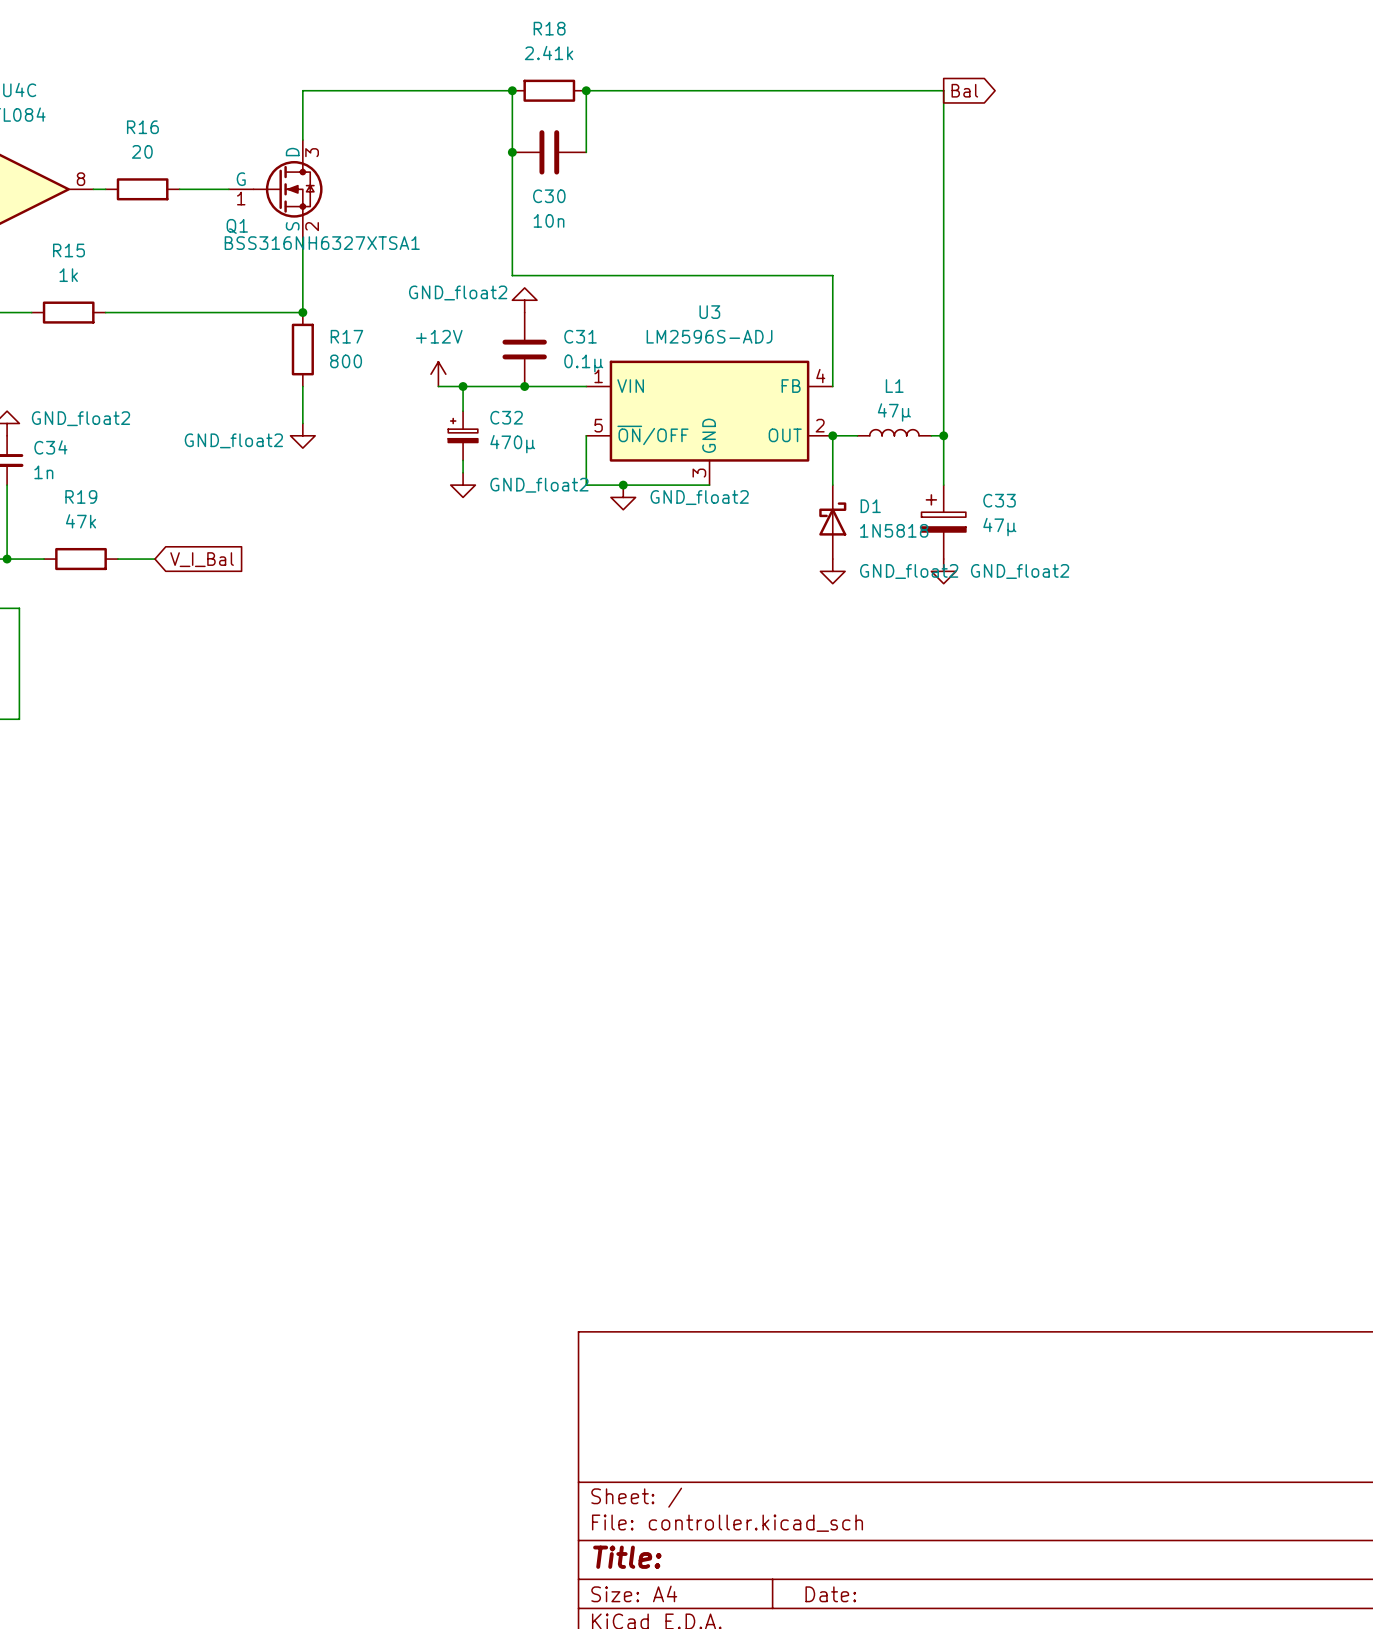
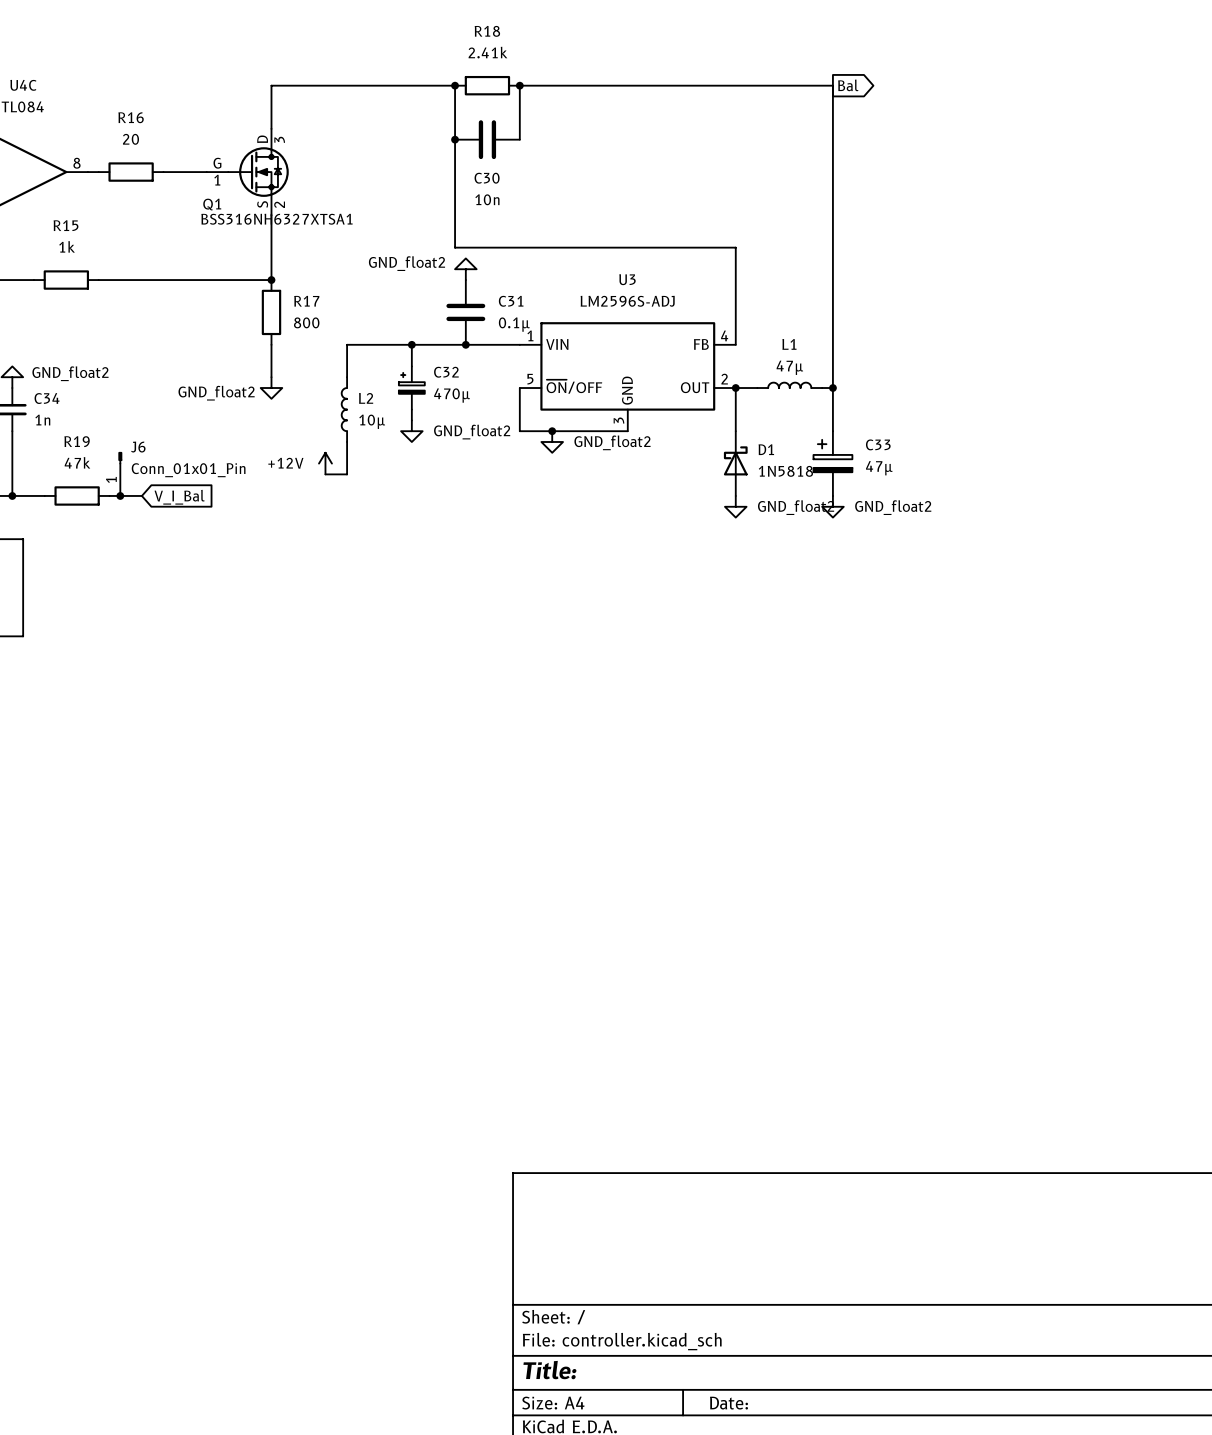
power symbol text position: +12V (439, 336) -> +12V (285, 463)
power symbol position: +12V (438, 374) -> +12V (325, 463)
wire: none -> (390, 344) (347, 344) (347, 377)
L2: none -> 10µ (344, 409)
wire: none -> (347, 441) (347, 474) (325, 474)
J6: none -> Conn_01x01_Pin (120, 474)
junction: none -> (120, 495)

